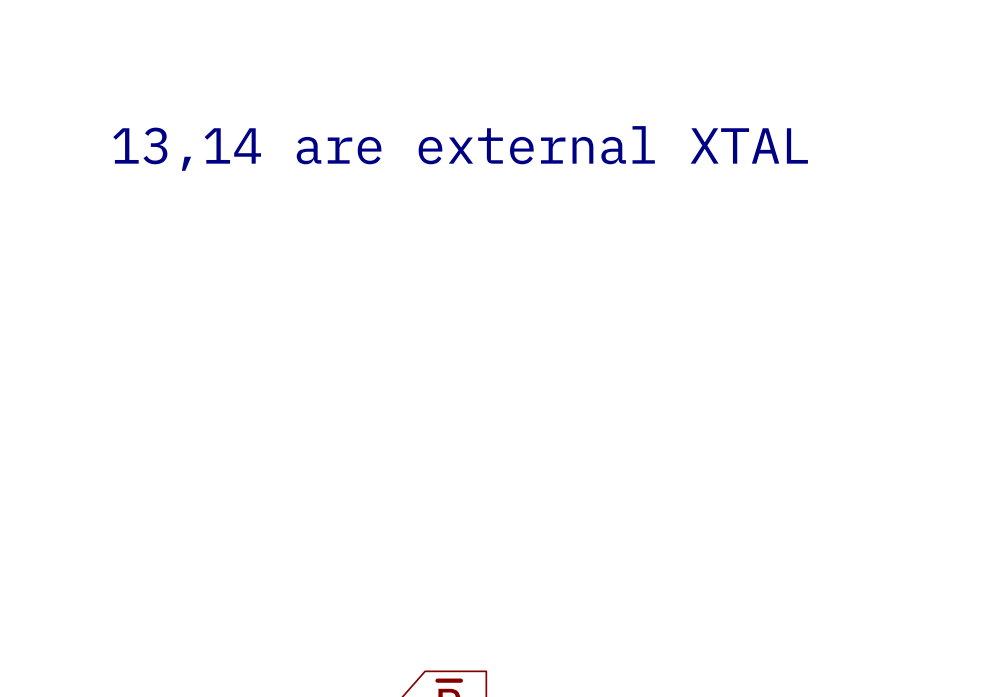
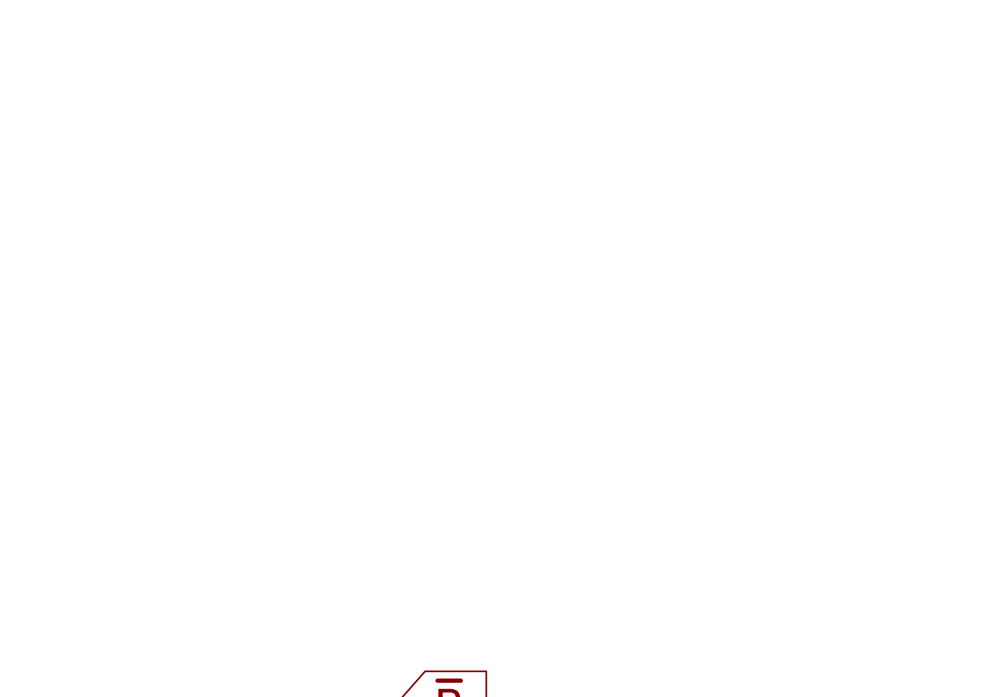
text: 13,14 are external XTAL (460, 148) -> none

